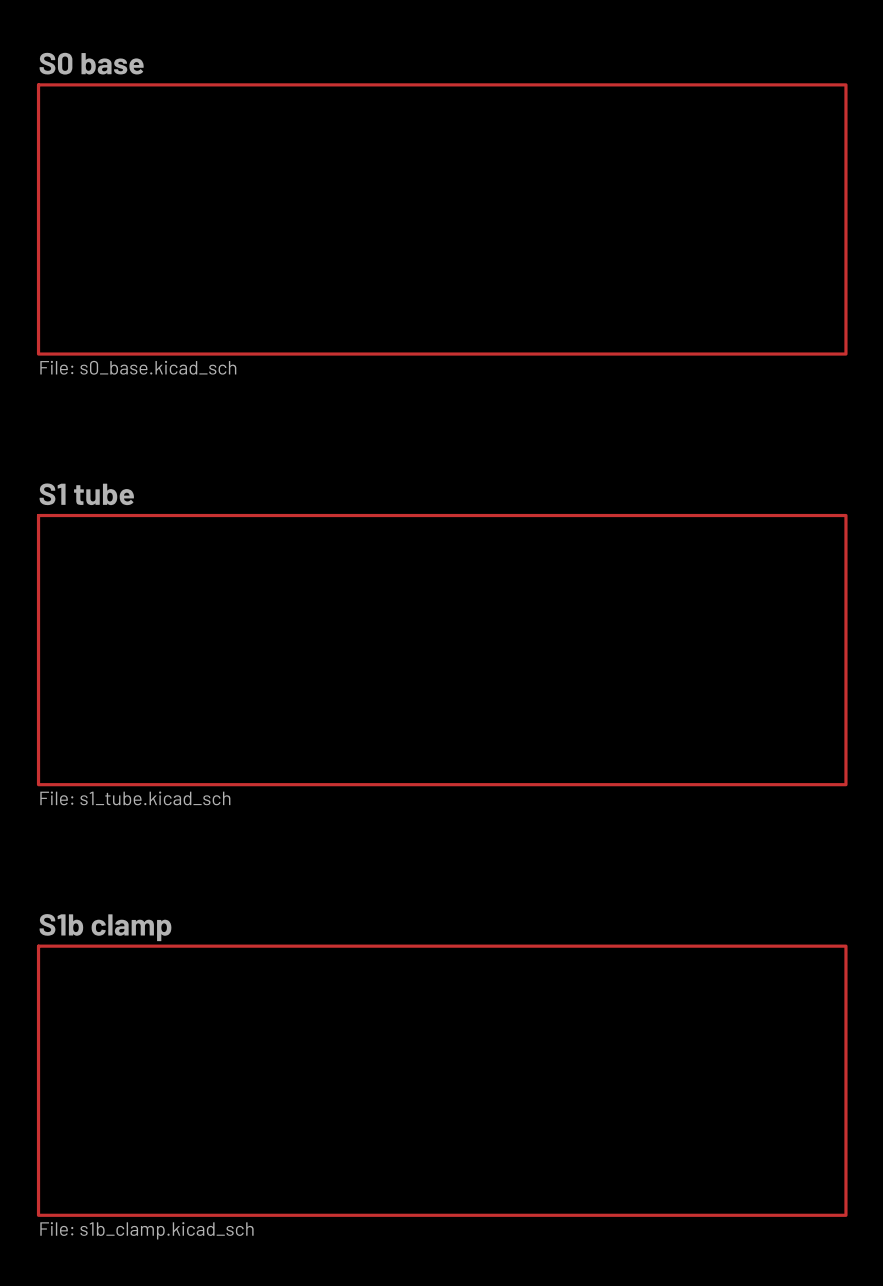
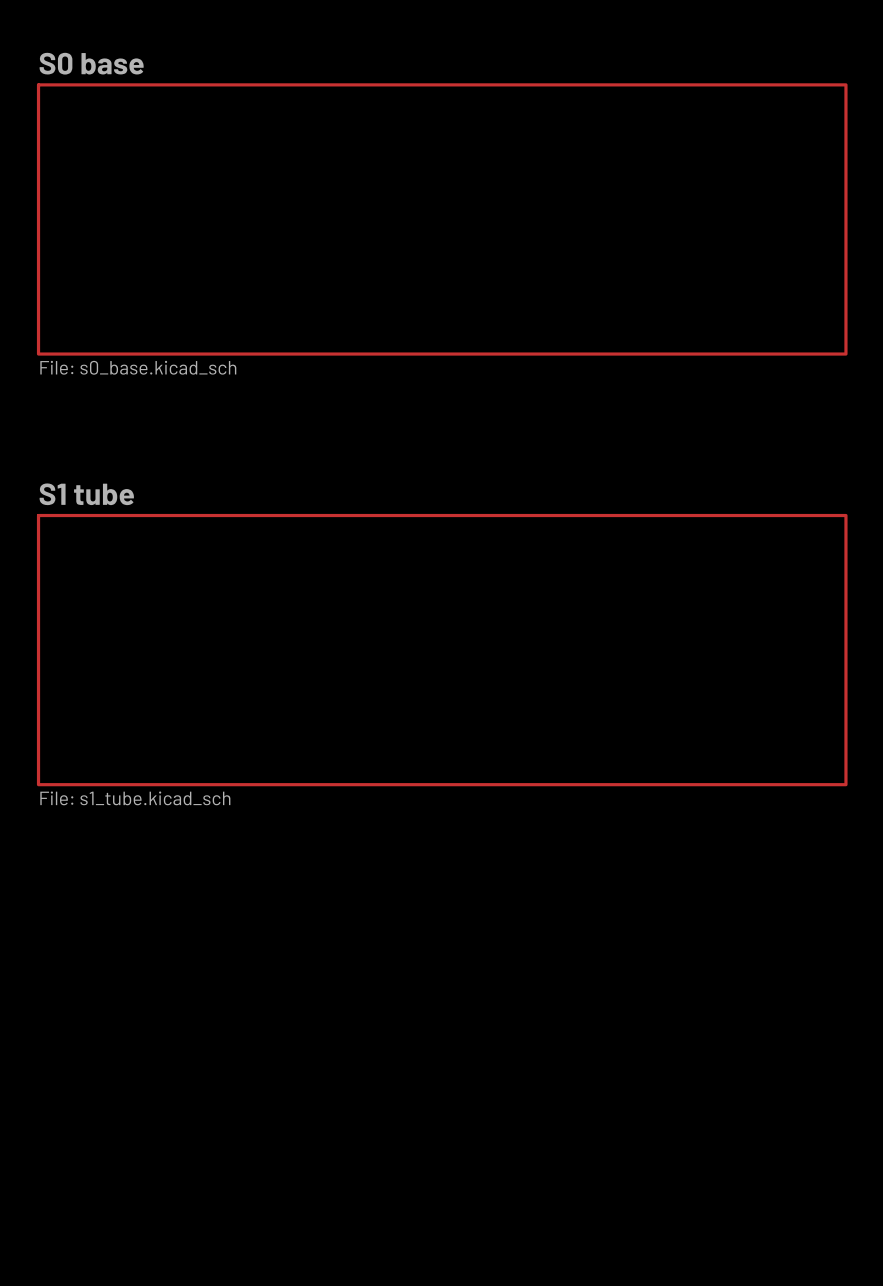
sheet S1b clamp: File: s1b_clamp.kicad_sch (442, 1080) -> none

